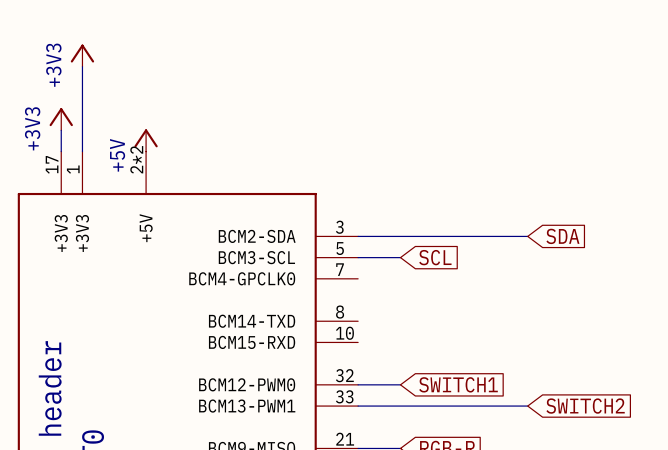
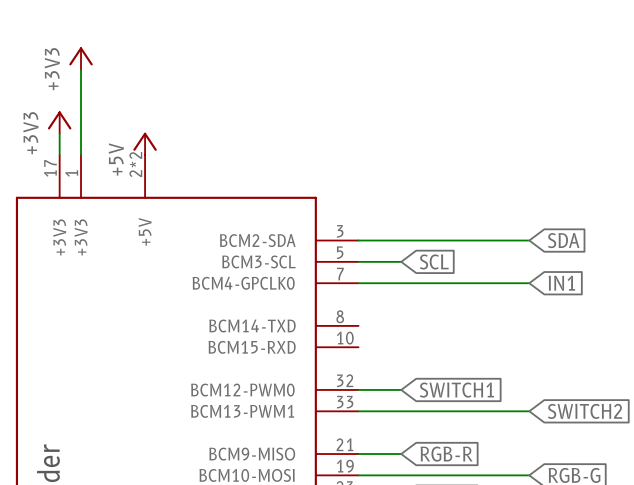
wire: none -> (358, 283) (529, 283)
global label: none -> IN1 (561, 283)

